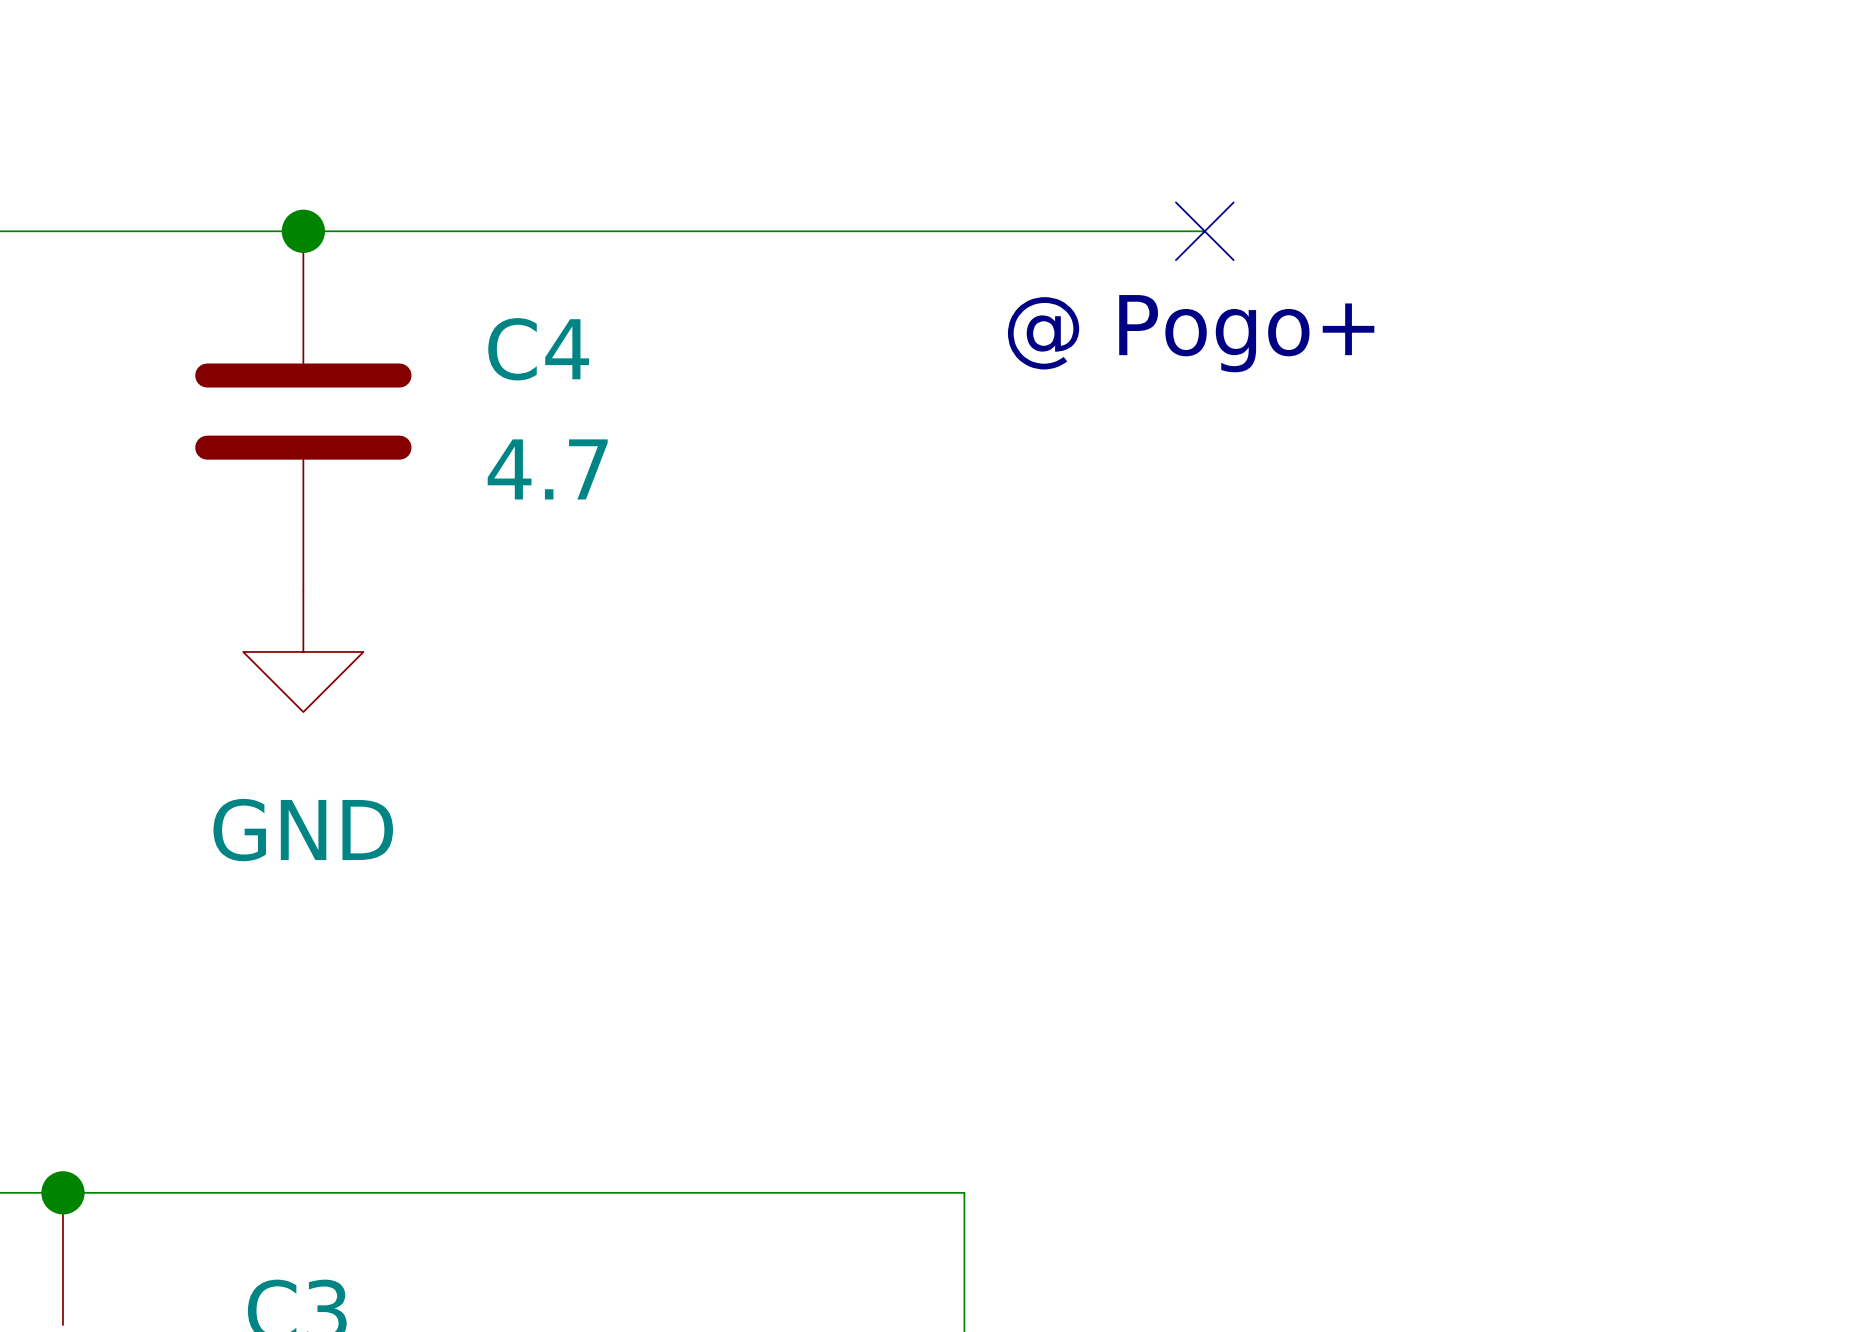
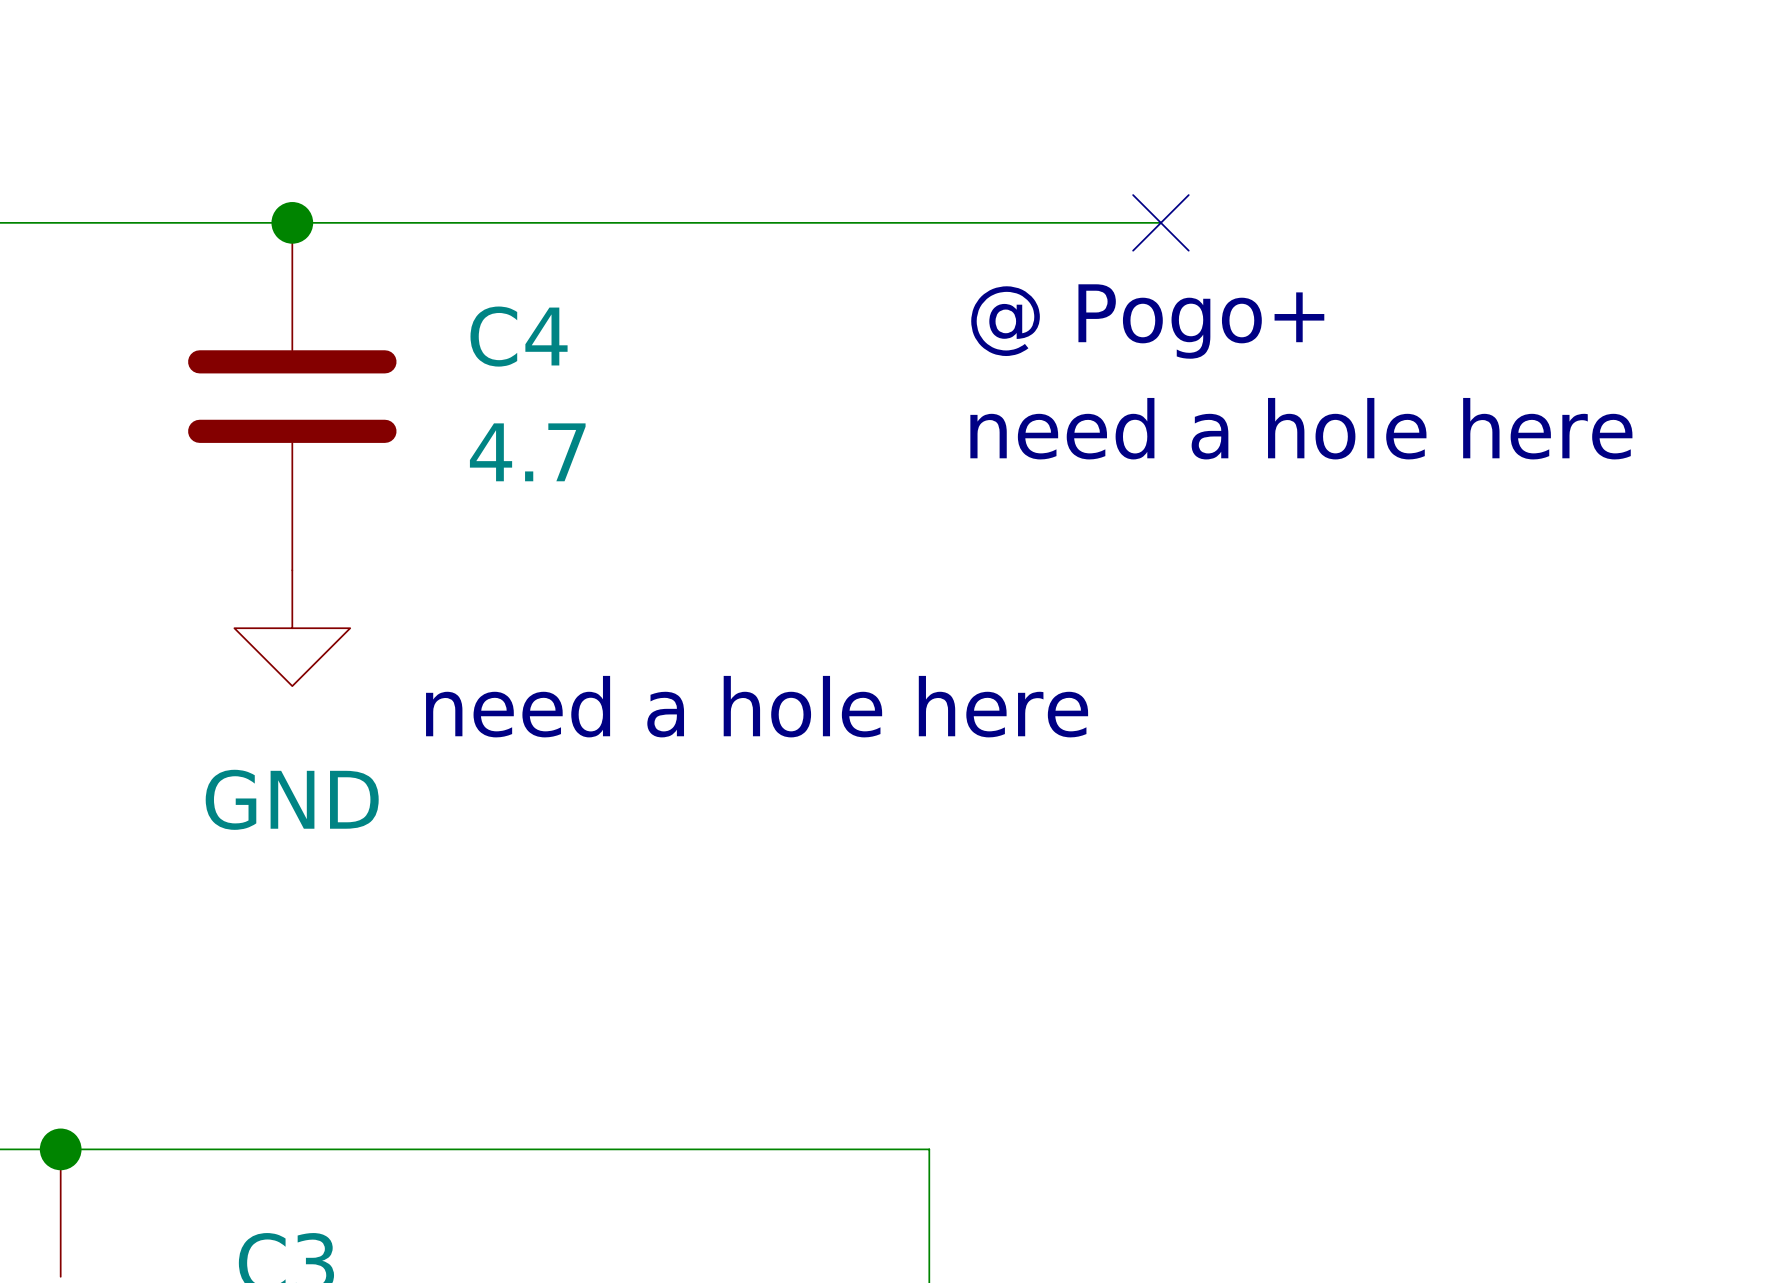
text: none -> need a hole here (1301, 428)
text: none -> need a hole here (757, 706)

